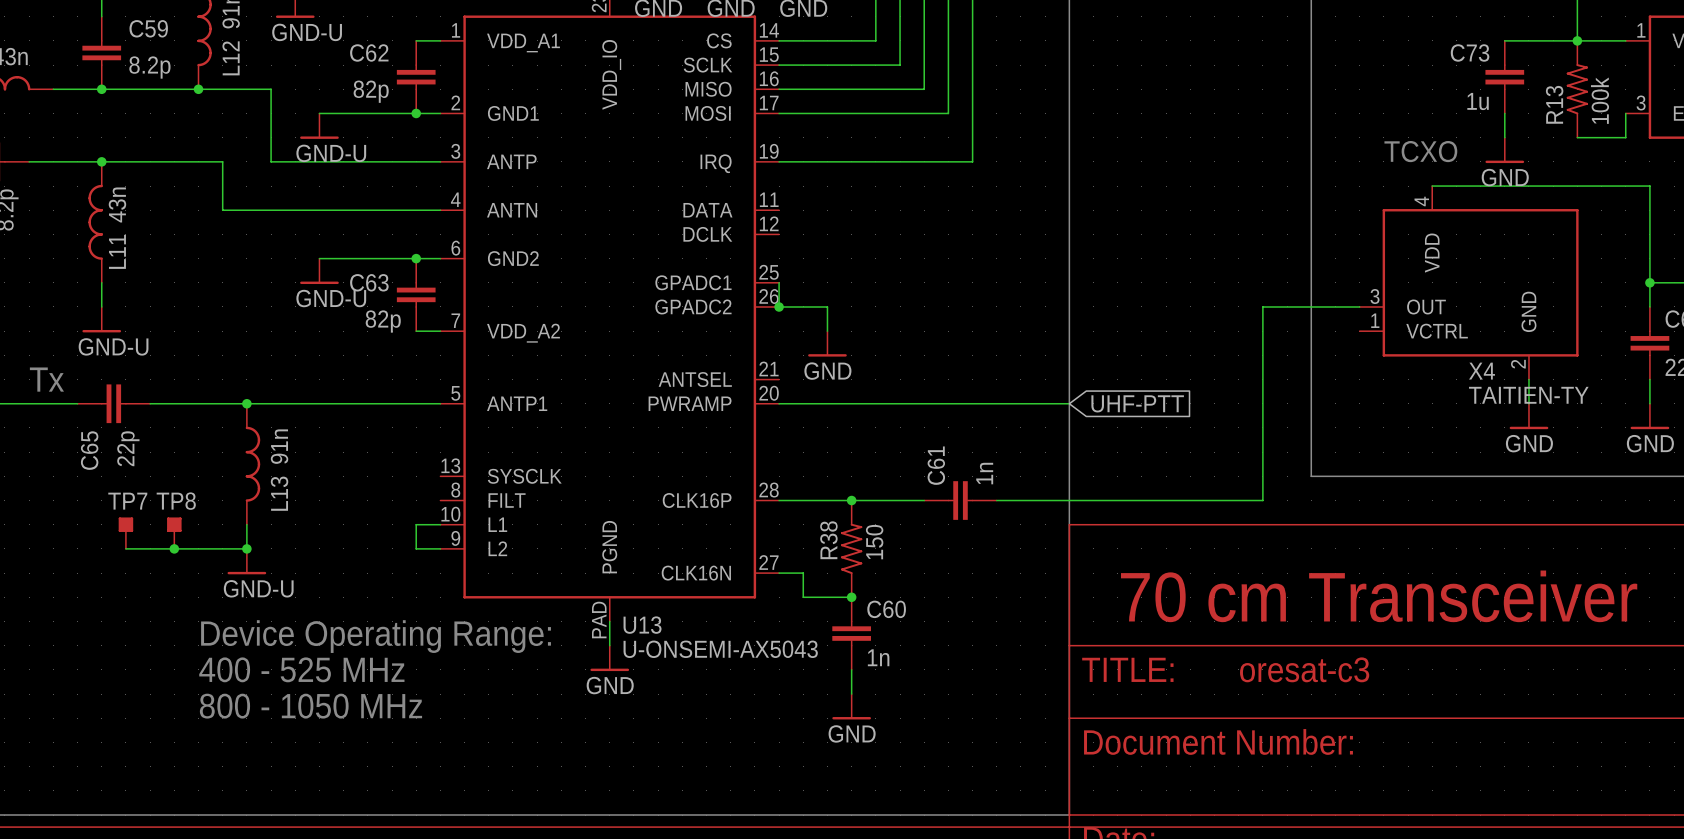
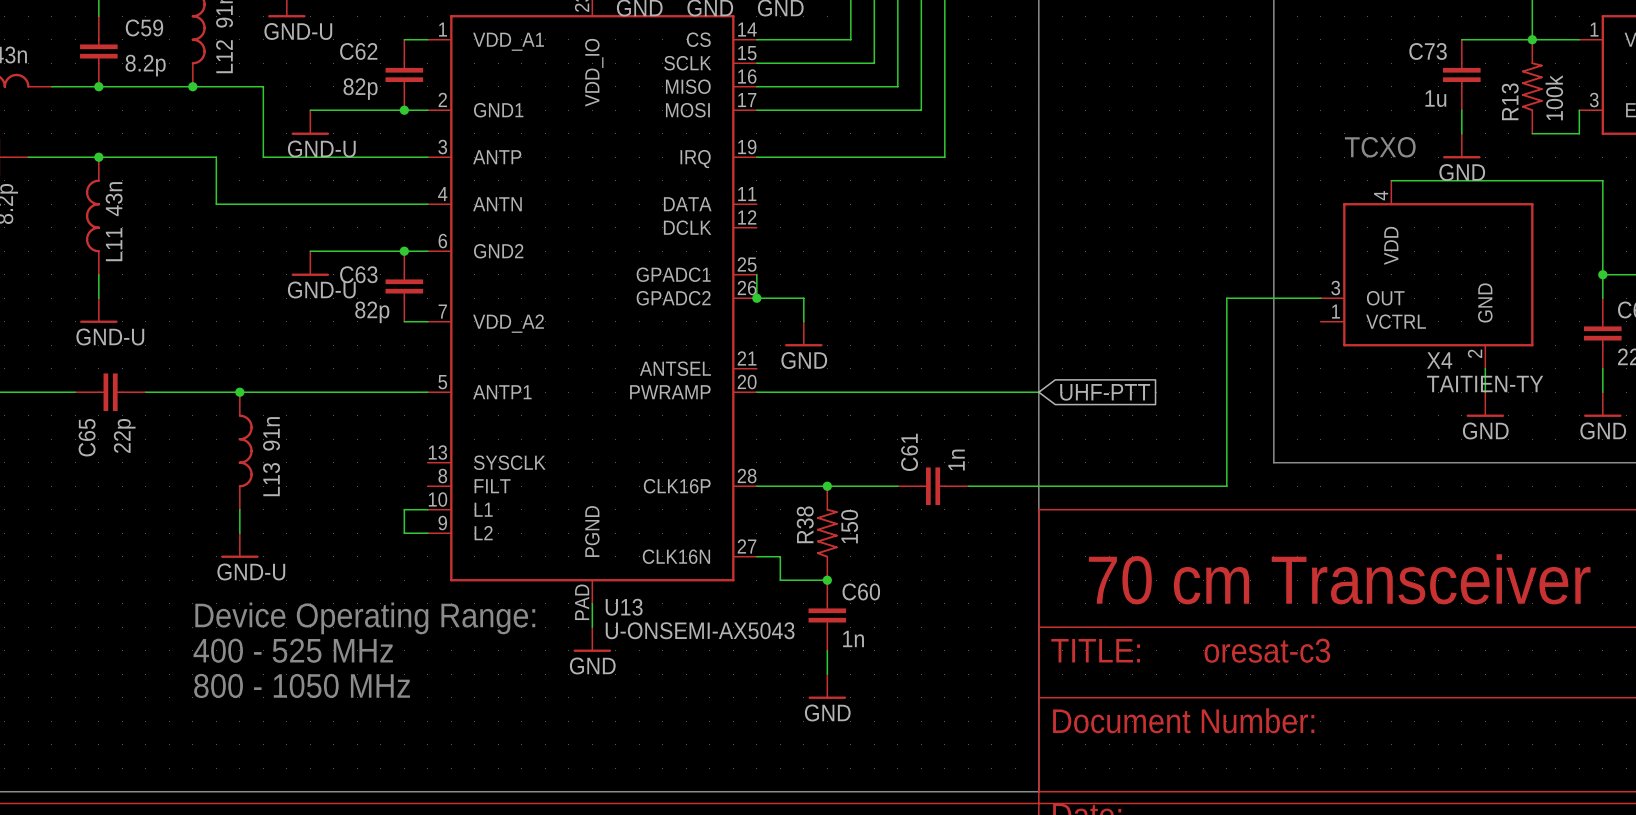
text: Tx (46, 379) -> none
TP7: (125, 533) -> none
TP8: (174, 533) -> none
wire: (125, 548) (246, 548) -> none
junction: (174, 548) -> none
junction: (246, 548) -> none

